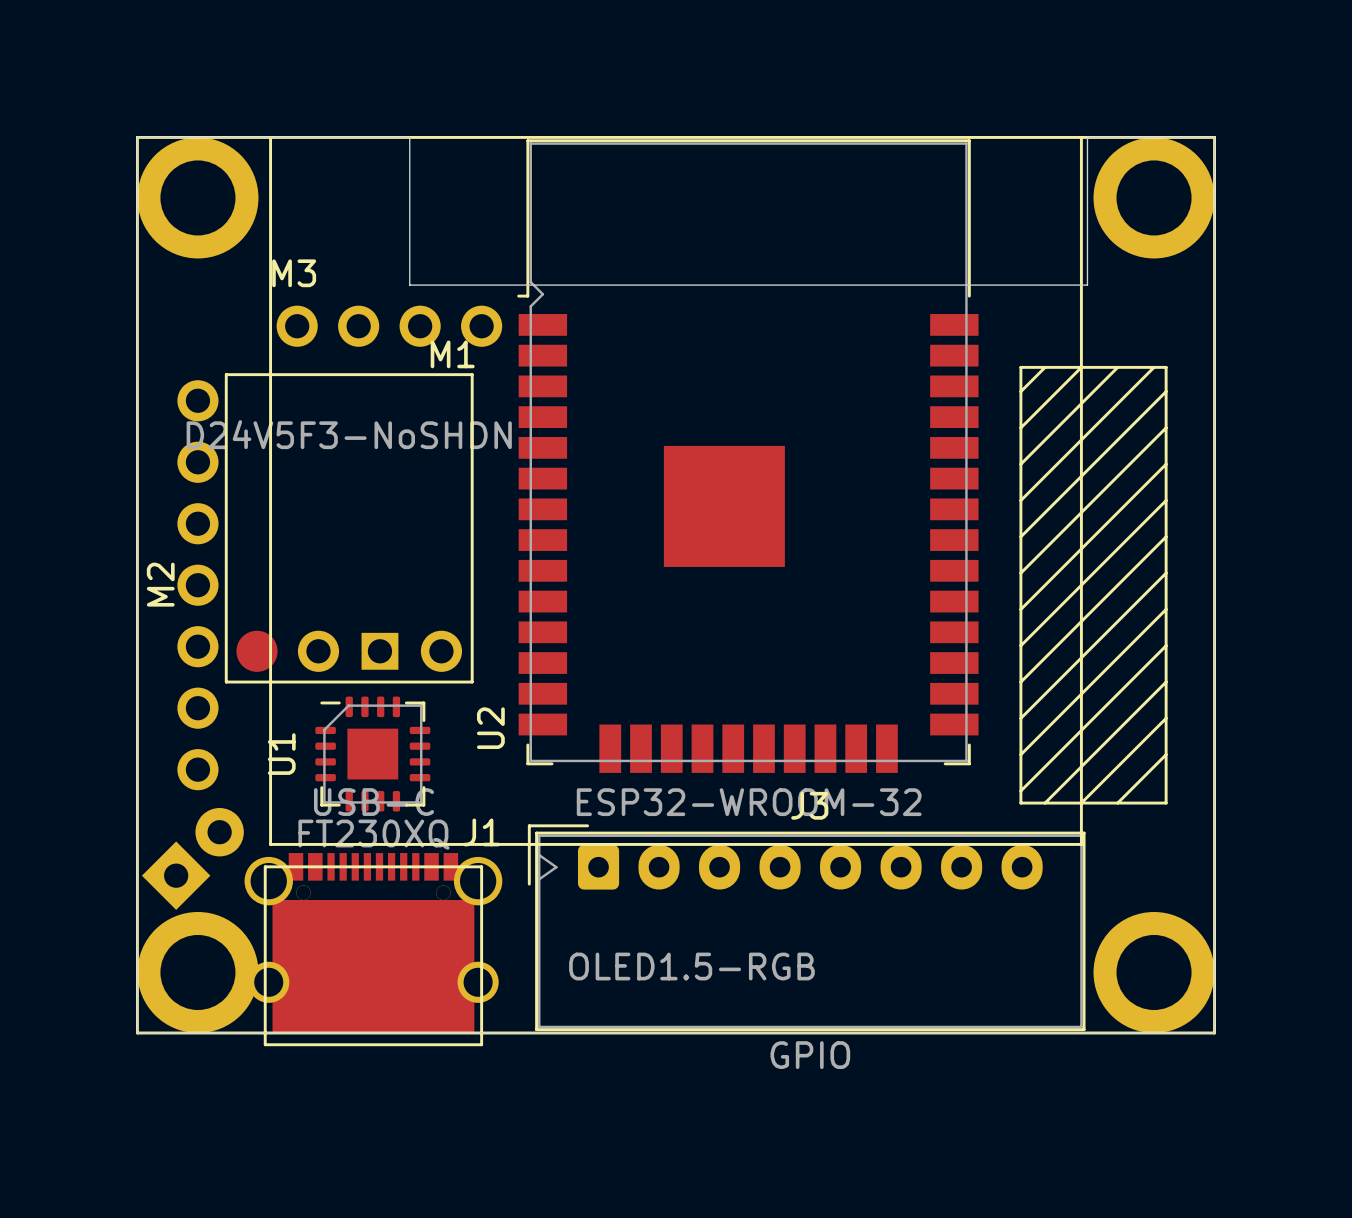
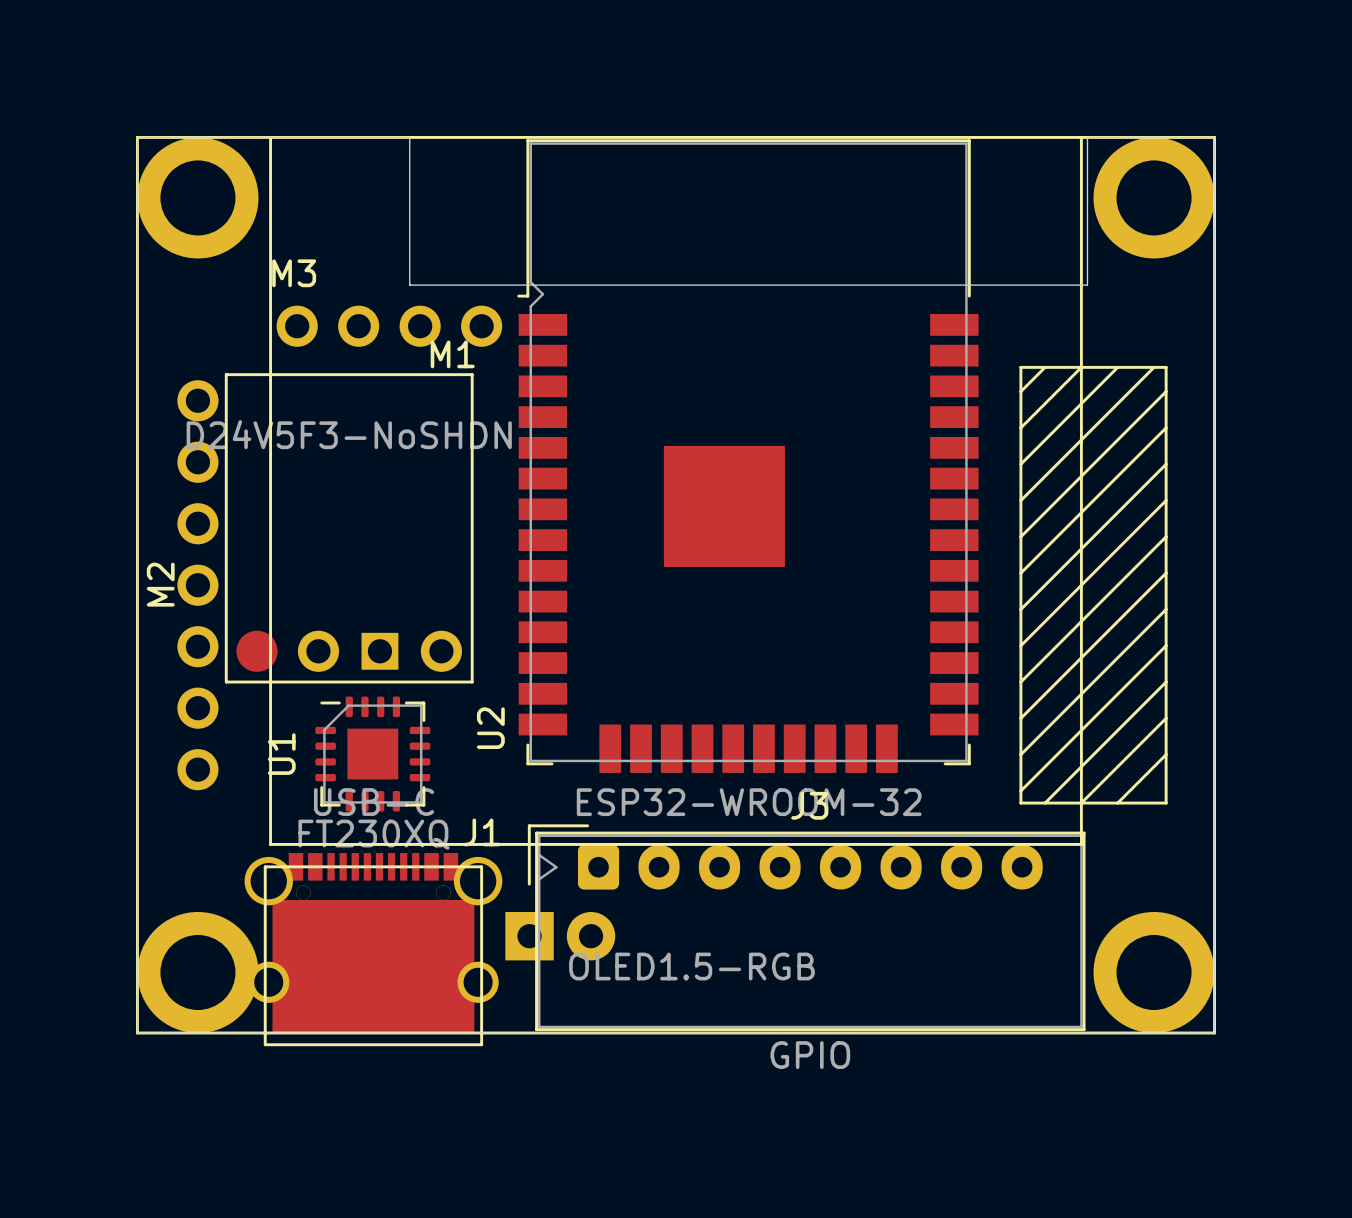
part: (192, 858) -> none
part: none -> (560, 936)

